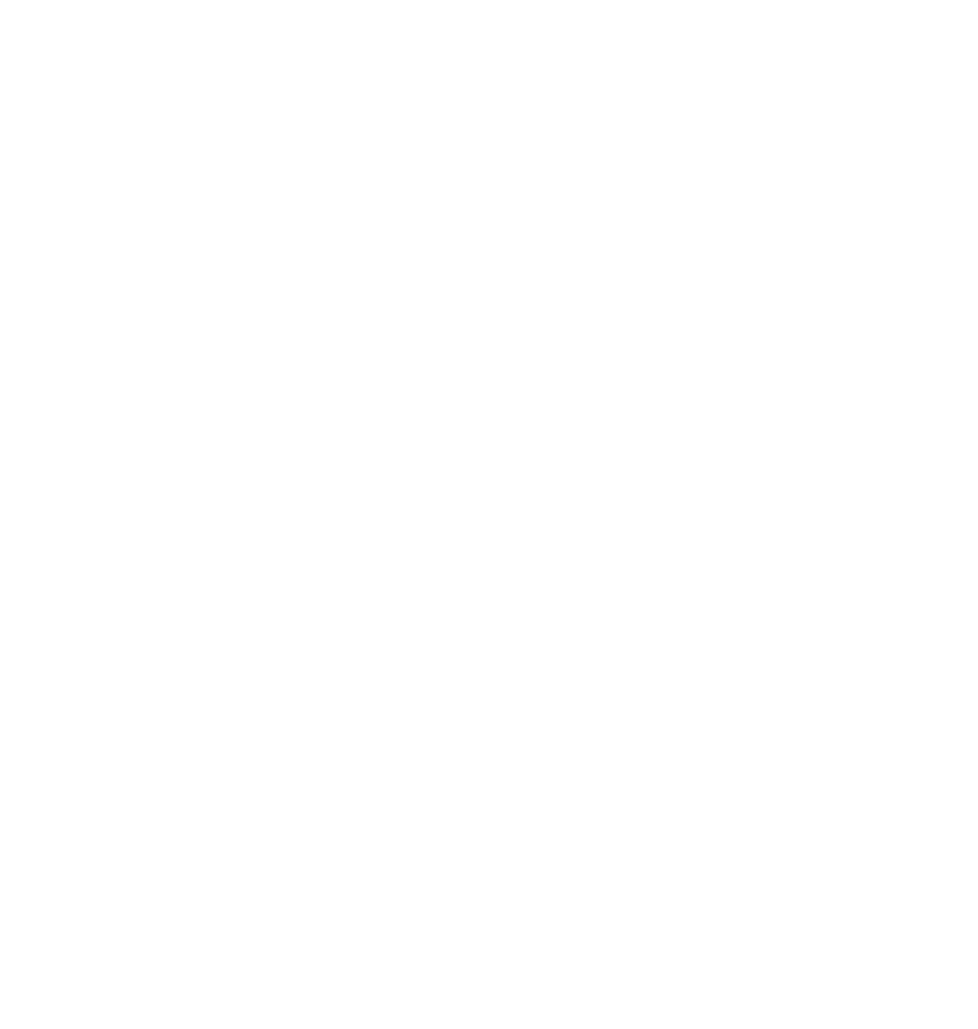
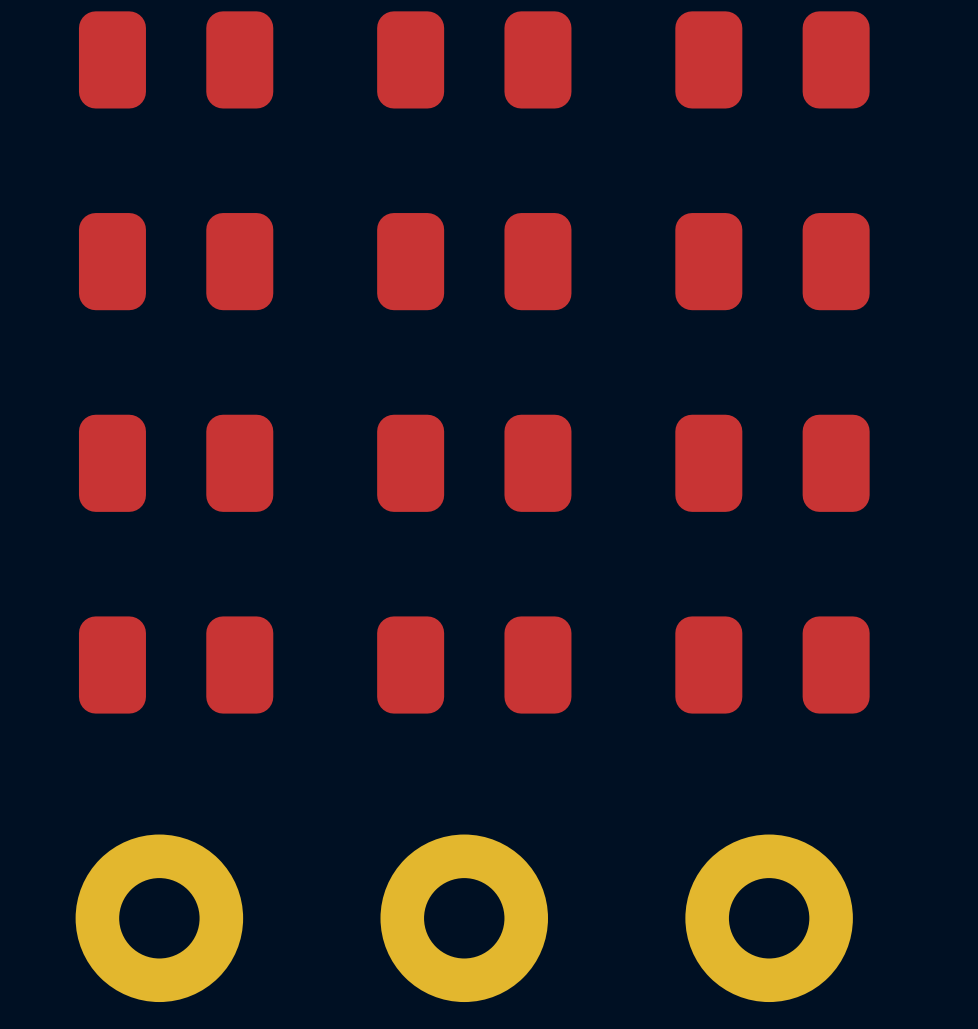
part: none -> (176, 59)
part: none -> (474, 59)
part: none -> (772, 59)
part: none -> (176, 261)
part: none -> (474, 261)
part: none -> (772, 261)
part: none -> (176, 463)
part: none -> (474, 463)
part: none -> (772, 463)
part: none -> (176, 665)
part: none -> (474, 665)
part: none -> (772, 665)
part: none -> (159, 918)
part: none -> (464, 918)
part: none -> (769, 918)

